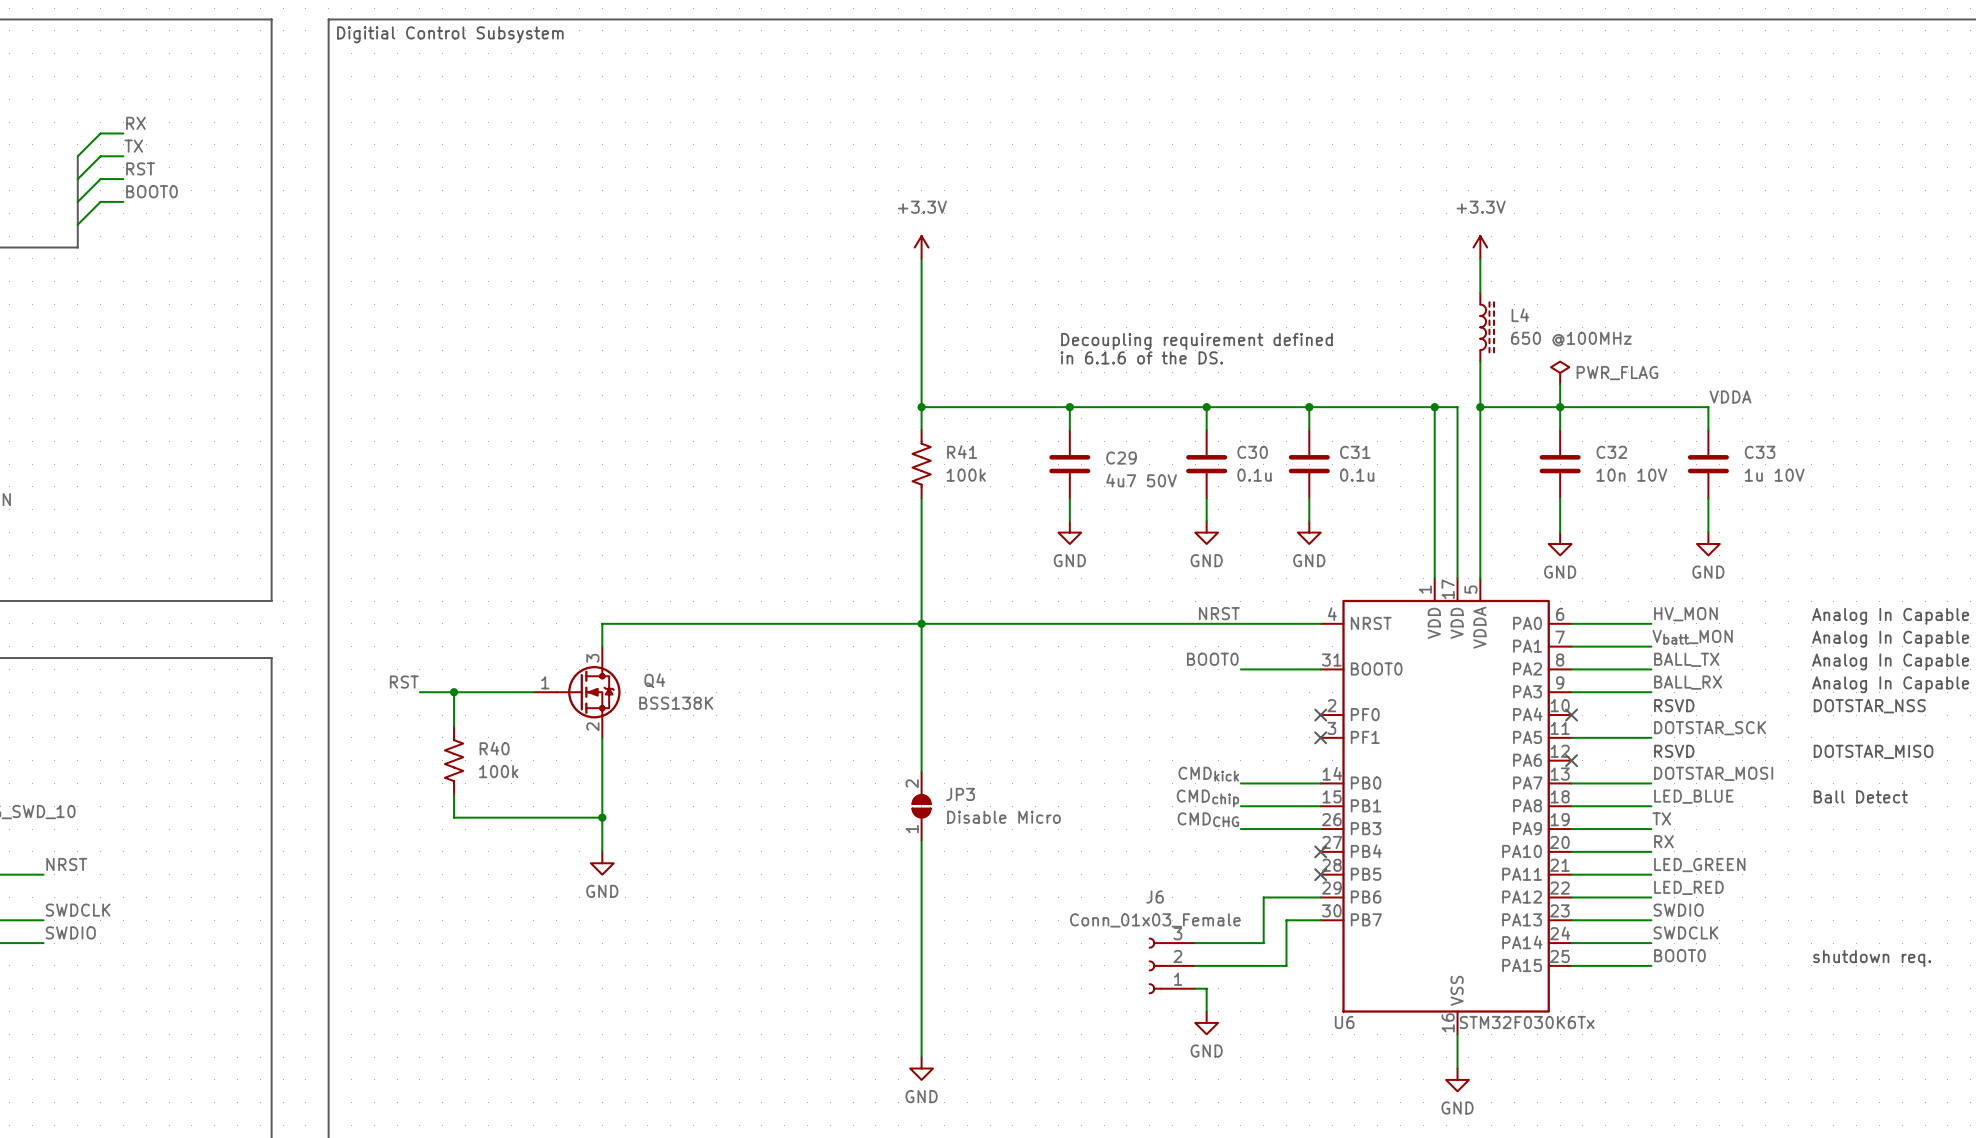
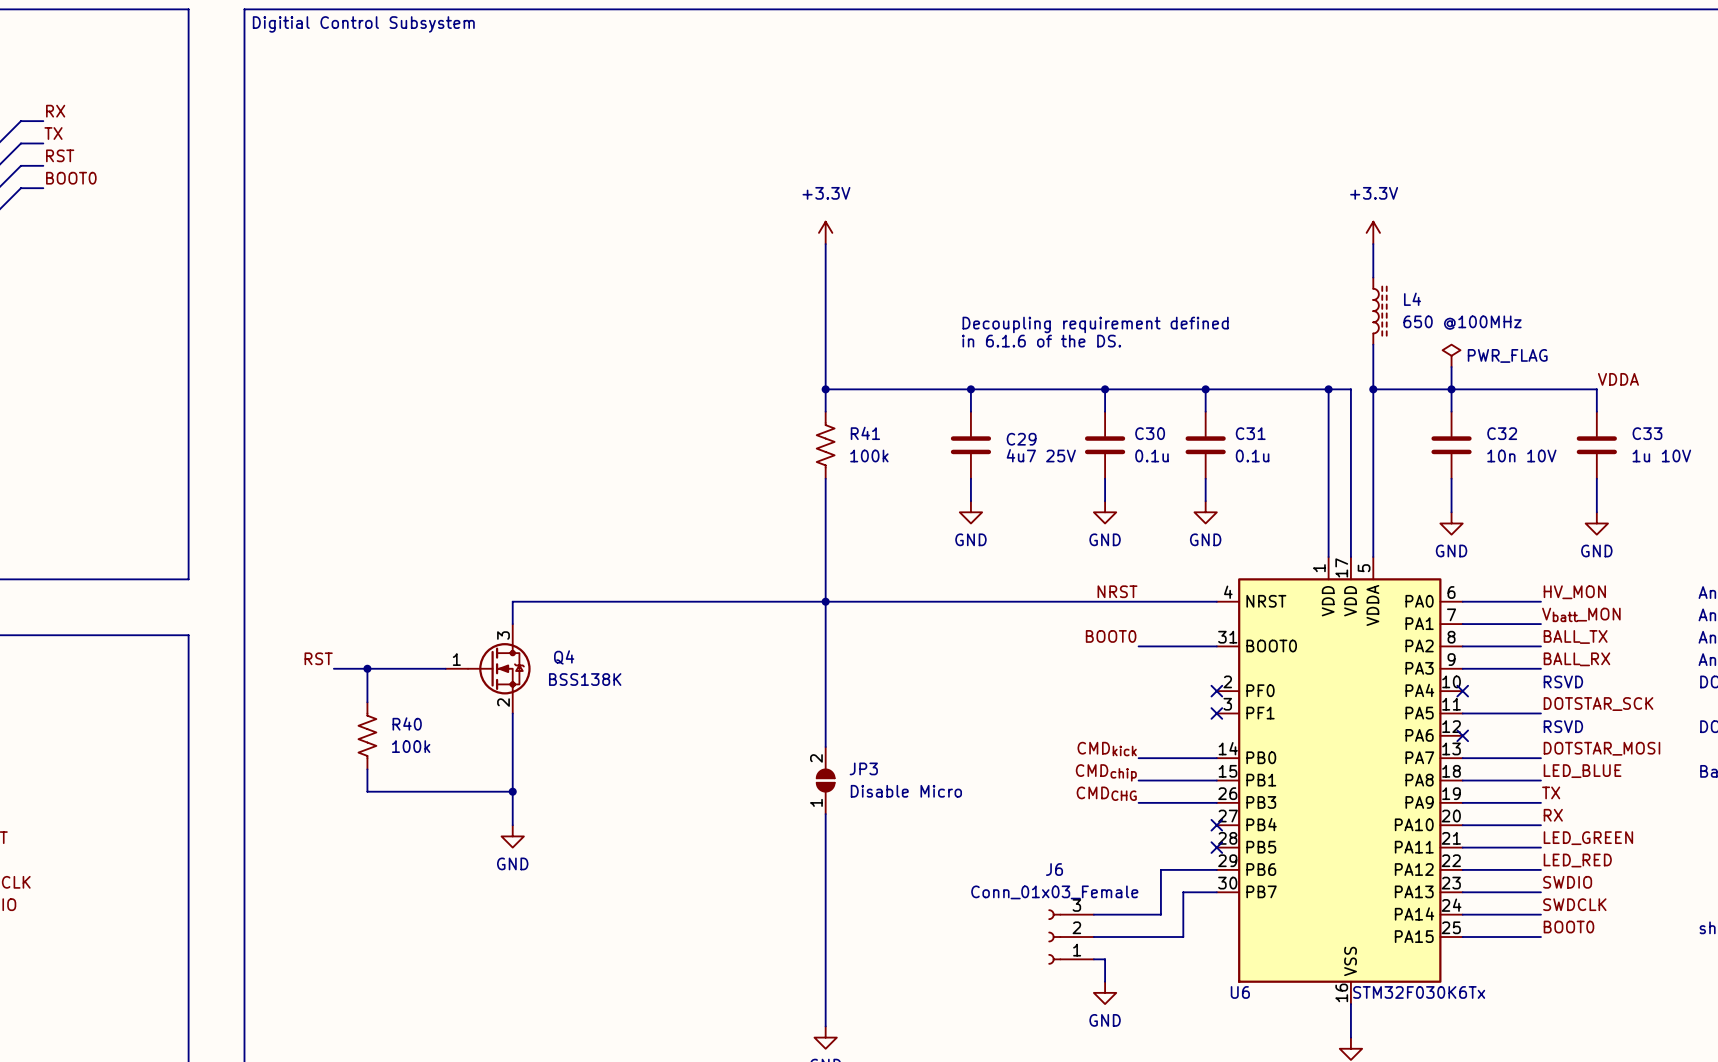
C29 value: 4u7 50V (1141, 480) -> 4u7 25V (1041, 455)

